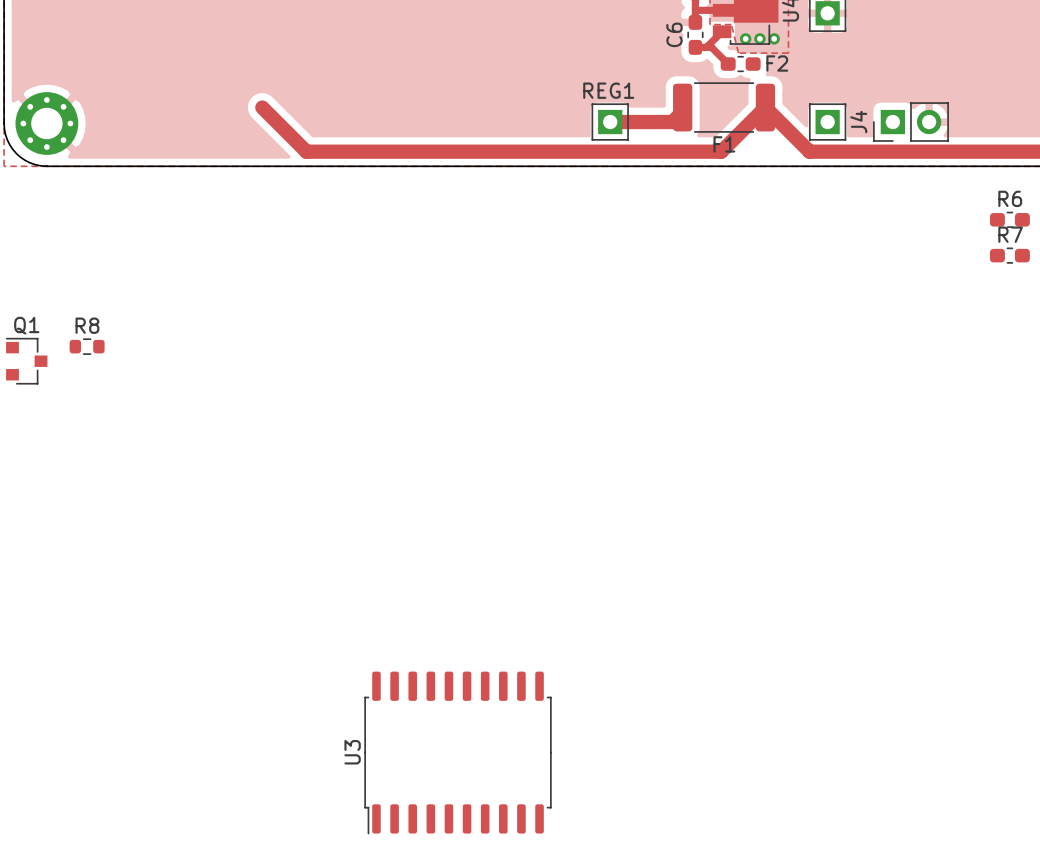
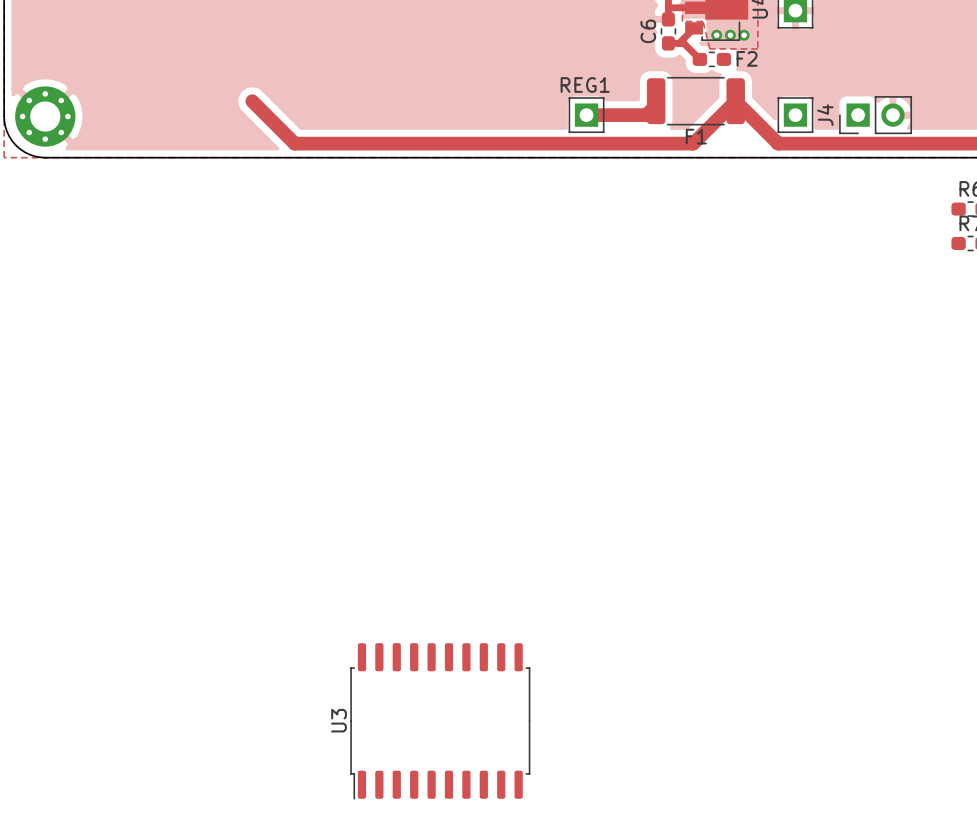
R8: (87, 346) -> none
Q1: (26, 361) -> none

